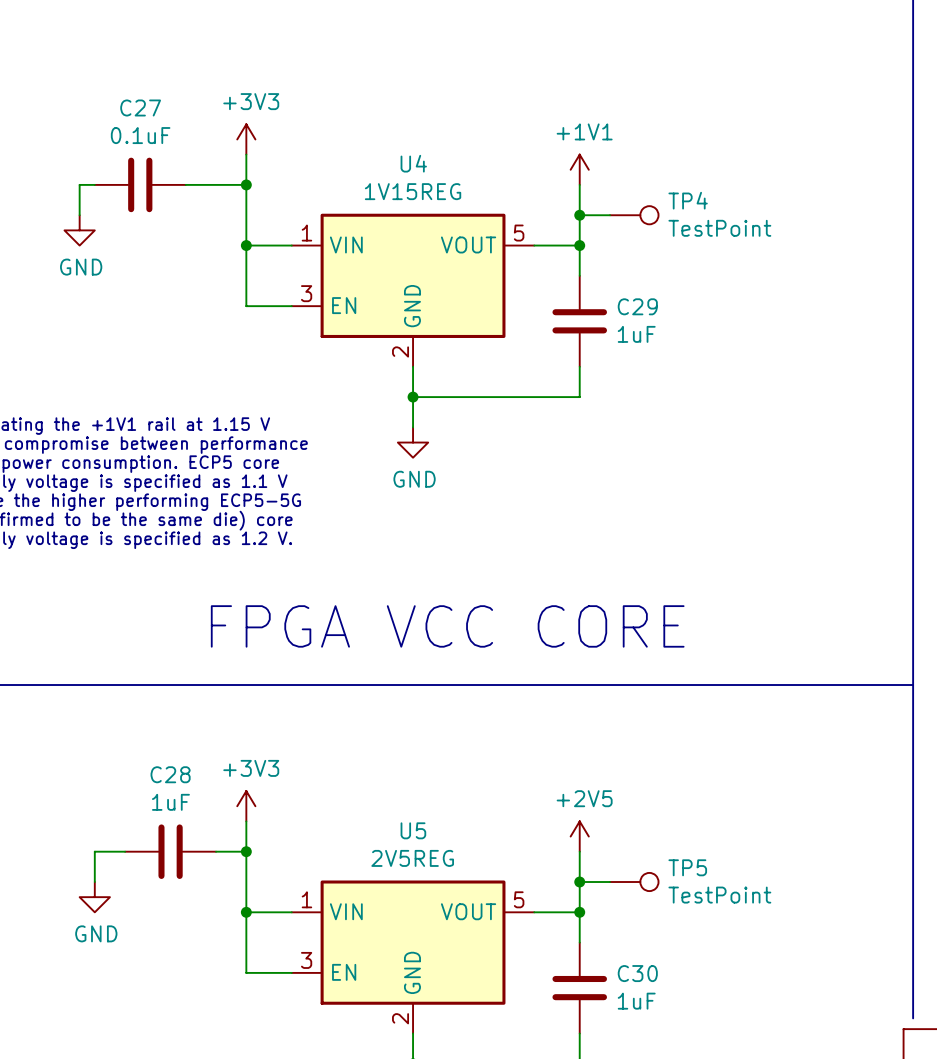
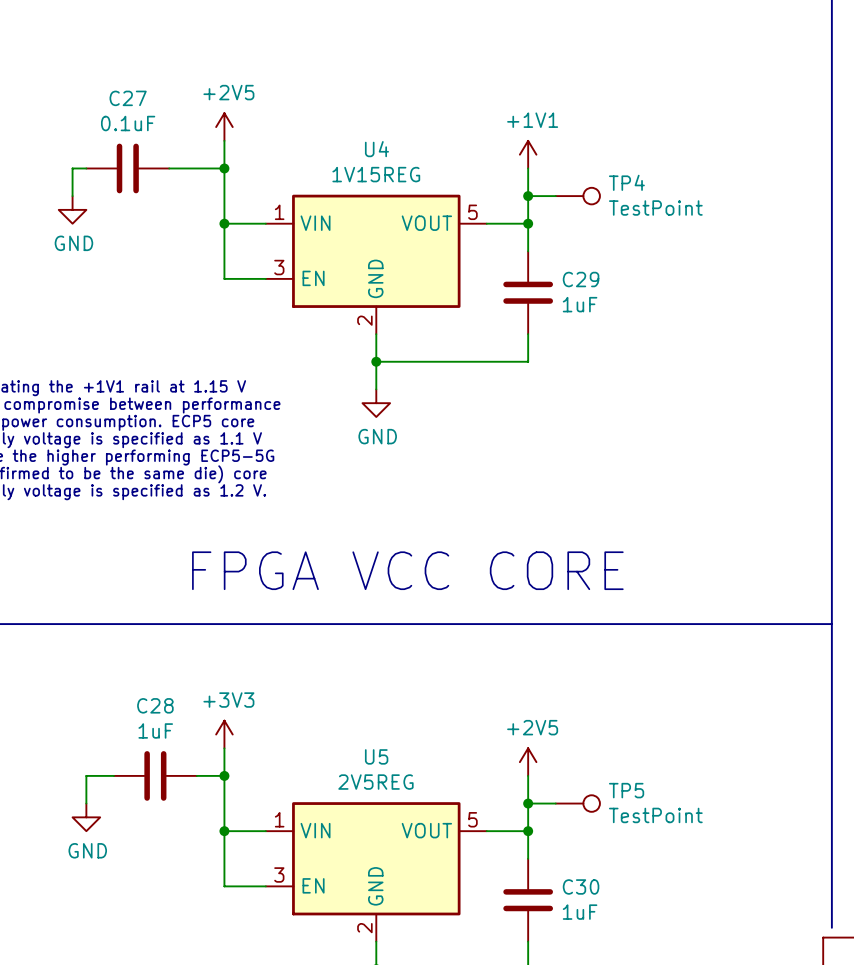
power symbol: +3V3 (246, 139) -> +2V5 (224, 127)

